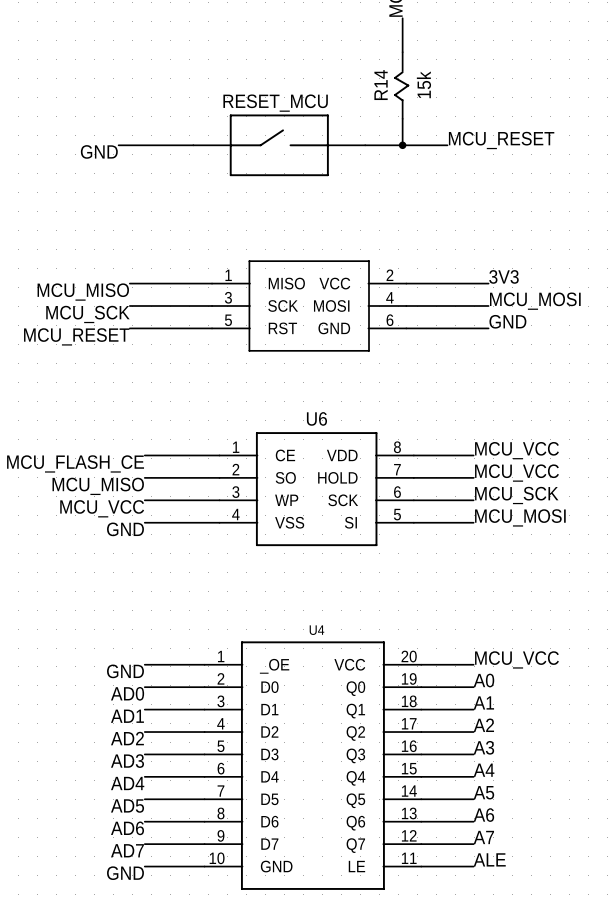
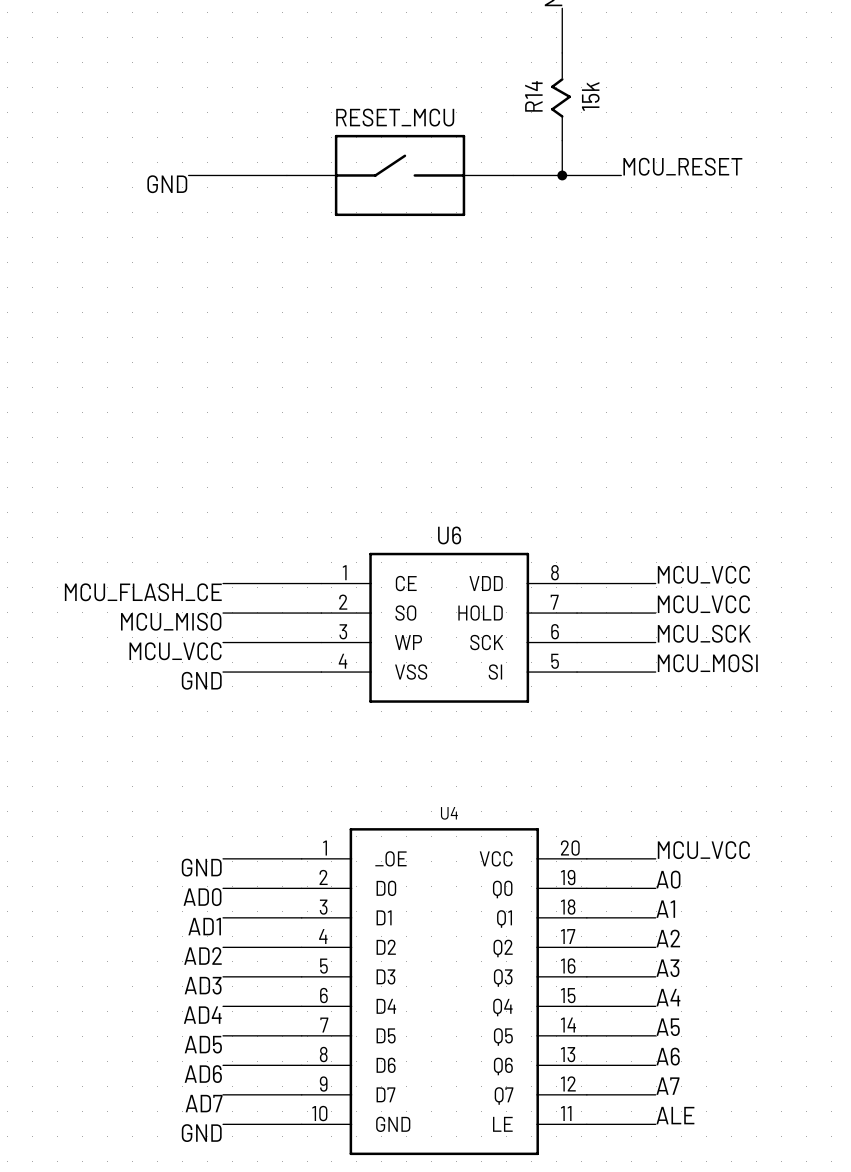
label: 3V3 (503, 276) -> none
wire: (129, 283) (212, 283) -> none
wire: (406, 283) (488, 283) -> none
label: MCU_MISO (83, 292) -> none
label: MCU_MOSI (535, 301) -> none
wire: (129, 305) (212, 305) -> none
part: (309, 305) -> none
wire: (406, 305) (488, 305) -> none
label: MCU_SCK (87, 314) -> none
label: GND (507, 321) -> none
wire: (129, 328) (212, 328) -> none
wire: (406, 328) (488, 328) -> none
label: MCU_RESET (76, 336) -> none

